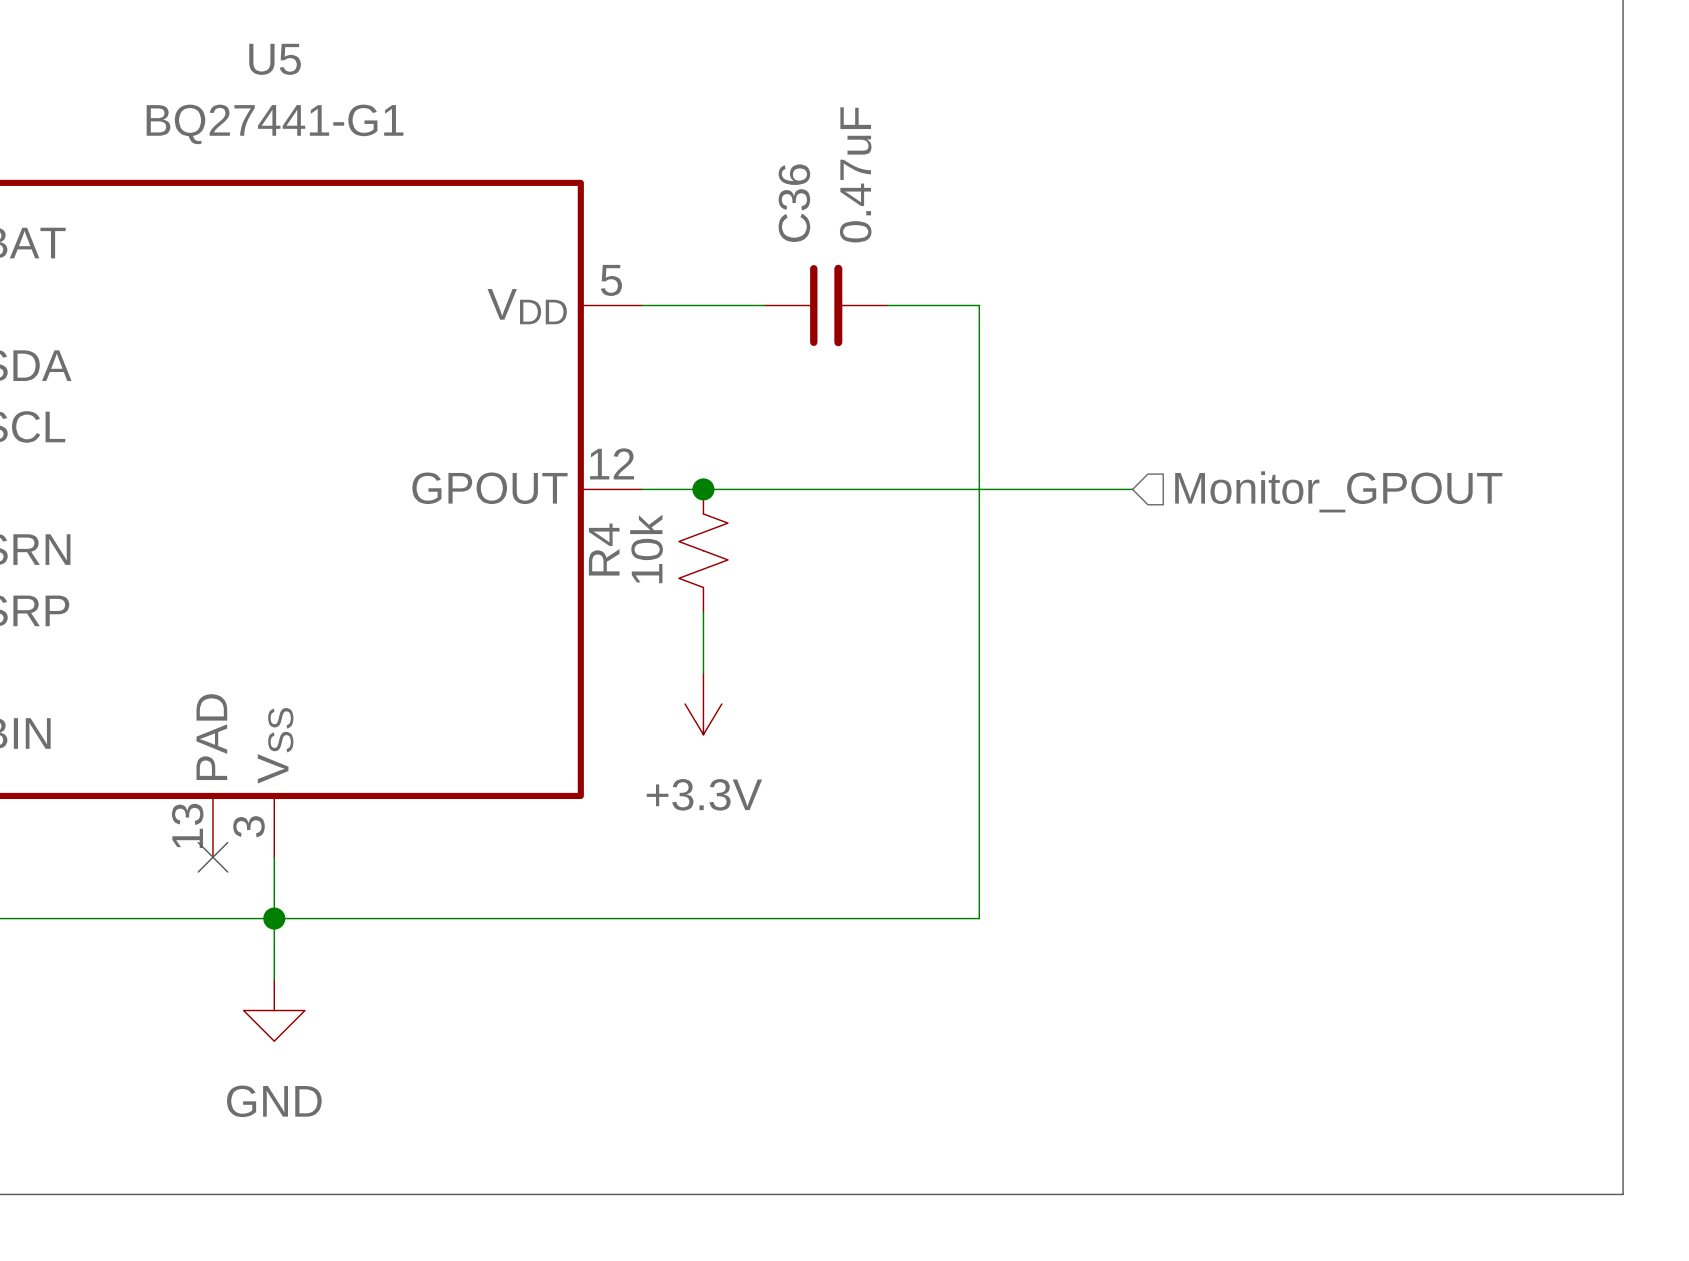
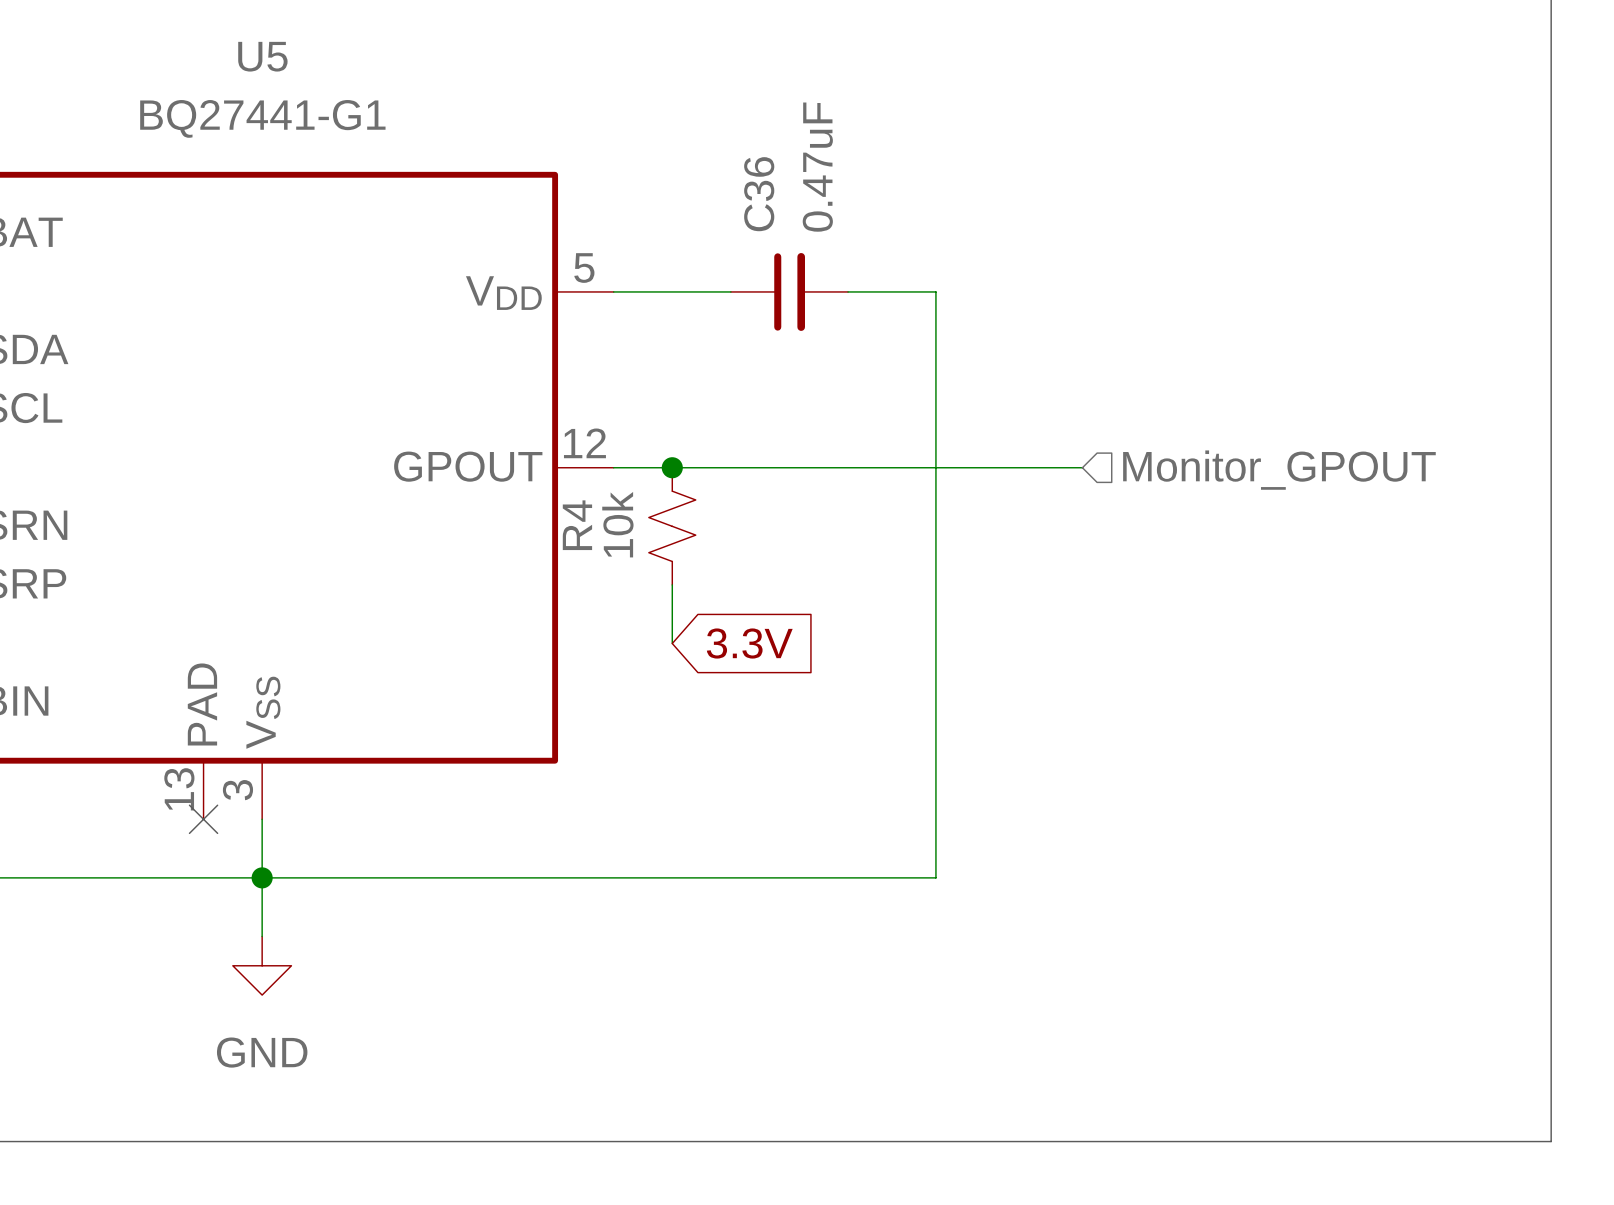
global label: none -> 3.3V (749, 643)
power symbol: +3.3V (703, 703) -> none

